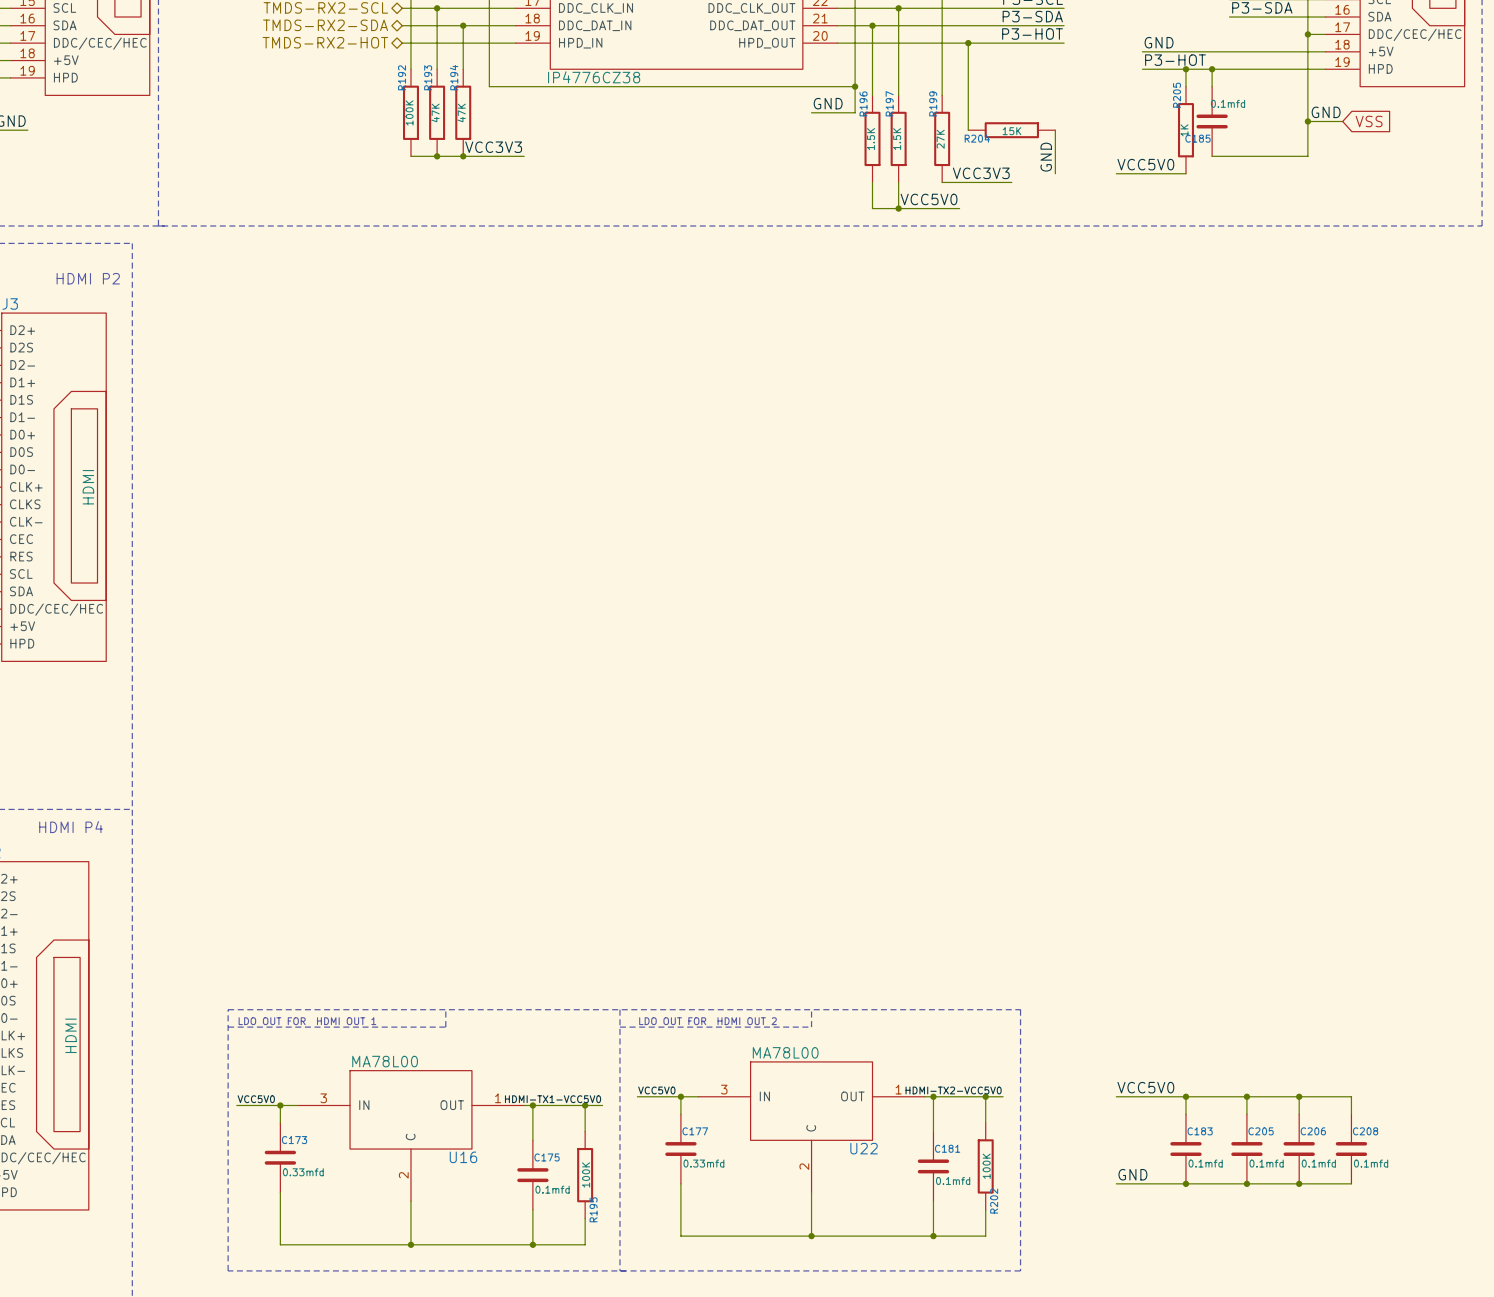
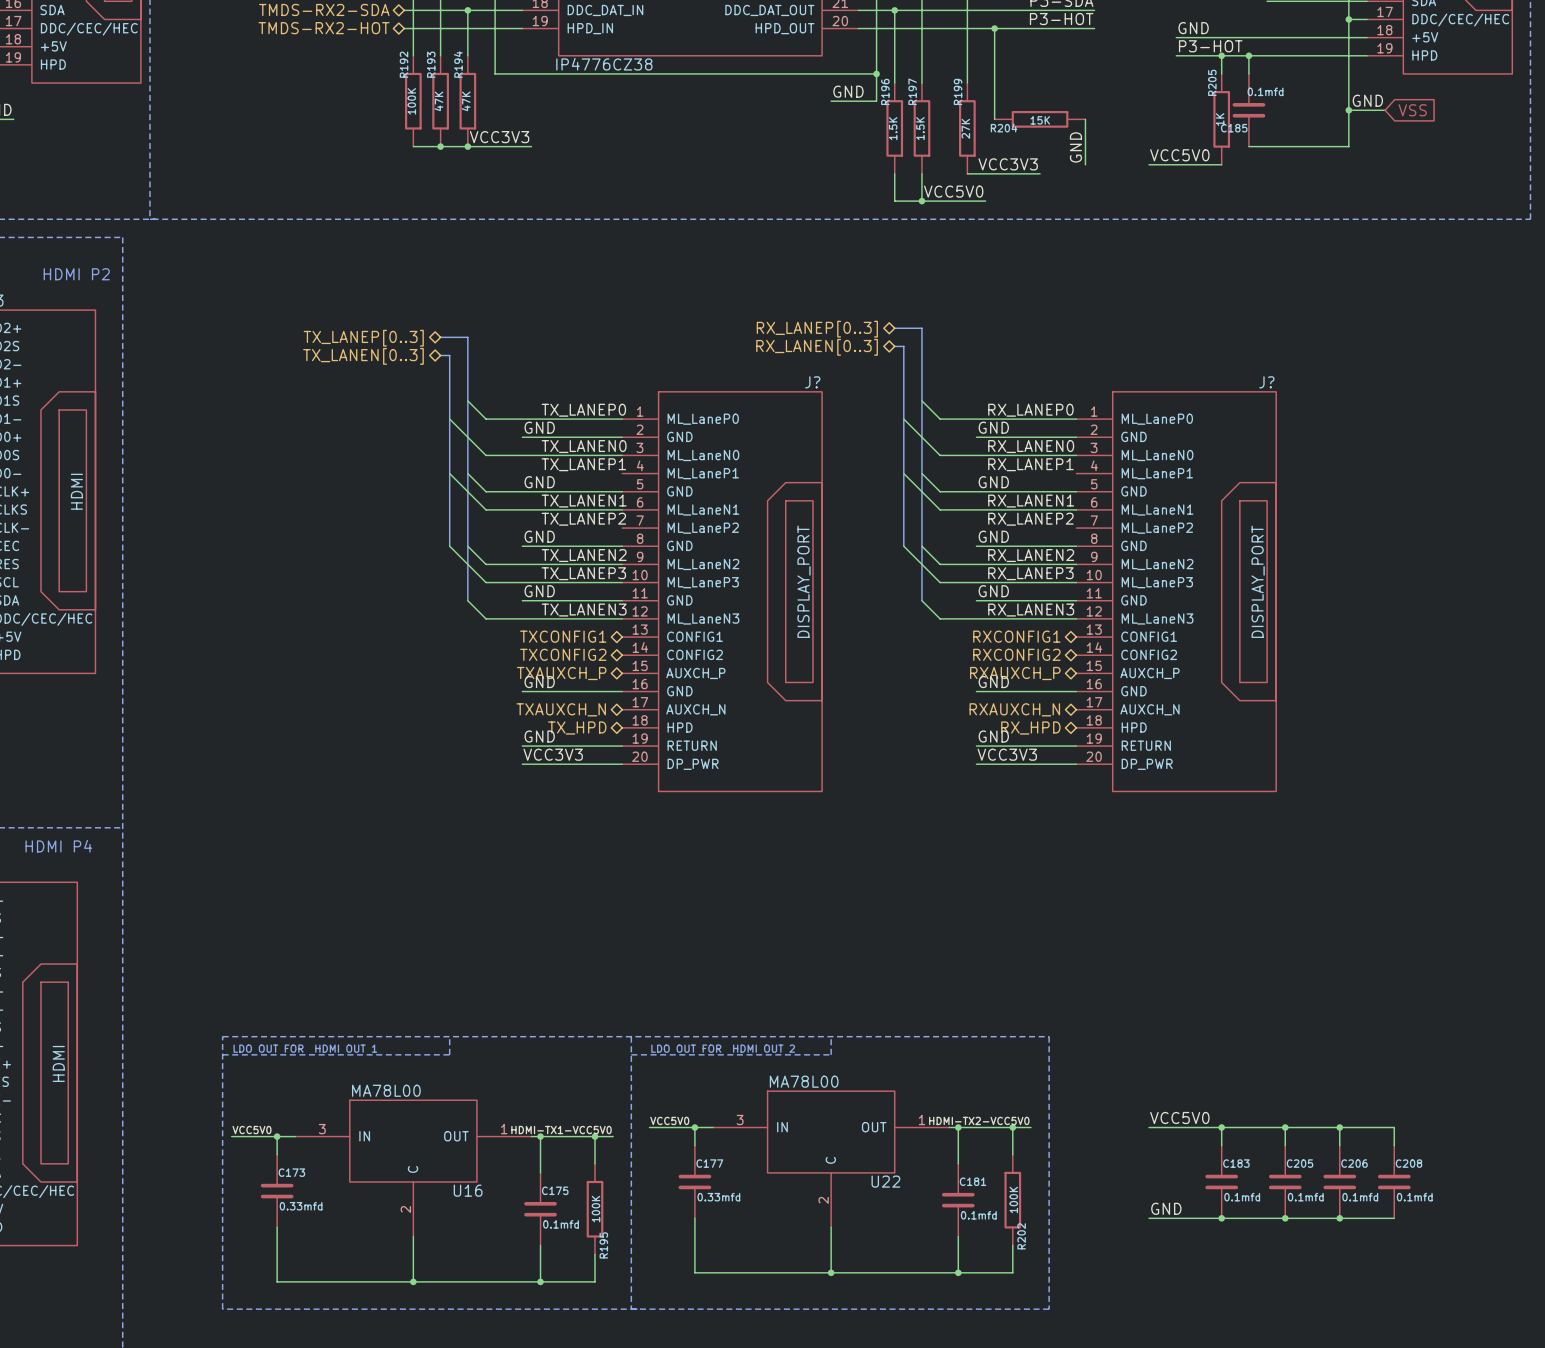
bus: none -> (894, 328) (921, 328) (921, 600)
hierarchical label: none -> RX_LANEP[0..3] (817, 329)
bus: none -> (440, 337) (467, 337) (467, 600)
hierarchical label: none -> TX_LANEP[0..3] (363, 338)
bus: none -> (894, 346) (903, 346) (903, 546)
hierarchical label: none -> RX_LANEN[0..3] (817, 347)
bus: none -> (440, 355) (449, 355) (449, 546)
hierarchical label: none -> TX_LANEN[0..3] (363, 356)
wire: none -> (467, 400) (486, 419) (622, 419)
wire: none -> (921, 400) (940, 419) (1076, 419)
label: none -> TX_LANEP0 (583, 410)
label: none -> RX_LANEP0 (1030, 410)
wire: none -> (449, 419) (486, 455) (622, 455)
wire: none -> (903, 419) (940, 455) (1076, 455)
label: none -> GND (539, 427)
label: none -> GND (993, 427)
wire: none -> (522, 437) (622, 437)
wire: none -> (976, 437) (1076, 437)
label: none -> TX_LANEN0 (584, 446)
label: none -> RX_LANEN0 (1031, 446)
label: none -> TX_LANEP1 (583, 464)
label: none -> RX_LANEP1 (1030, 464)
wire: none -> (449, 473) (486, 509) (622, 509)
wire: none -> (467, 473) (486, 491) (622, 491)
wire: none -> (903, 473) (940, 509) (1076, 509)
wire: none -> (921, 473) (940, 491) (1076, 491)
label: none -> GND (539, 482)
label: none -> GND (993, 482)
label: none -> TX_LANEN1 (584, 501)
label: none -> RX_LANEN1 (1031, 501)
label: none -> TX_LANEP2 (583, 519)
label: none -> RX_LANEP2 (1030, 519)
label: none -> GND (539, 536)
label: none -> GND (993, 536)
wire: none -> (449, 546) (486, 582) (622, 582)
wire: none -> (467, 546) (486, 564) (622, 564)
wire: none -> (522, 546) (622, 546)
wire: none -> (903, 546) (940, 582) (1076, 582)
wire: none -> (921, 546) (940, 564) (1076, 564)
wire: none -> (976, 546) (1076, 546)
label: none -> TX_LANEN2 (584, 555)
label: none -> RX_LANEN2 (1031, 555)
label: none -> TX_LANEP3 (583, 573)
label: none -> RX_LANEP3 (1030, 573)
label: none -> GND (539, 591)
label: none -> GND (993, 591)
J?: none -> DISPLAY_PORT (722, 591)
J?: none -> DISPLAY_PORT (1176, 591)
wire: none -> (467, 600) (486, 618) (622, 618)
wire: none -> (522, 600) (622, 600)
wire: none -> (921, 600) (940, 618) (1076, 618)
wire: none -> (976, 600) (1076, 600)
label: none -> TX_LANEN3 (584, 610)
label: none -> RX_LANEN3 (1031, 610)
hierarchical label: none -> TXCONFIG1 (563, 636)
hierarchical label: none -> RXCONFIG1 (1016, 636)
hierarchical label: none -> TXCONFIG2 (563, 654)
hierarchical label: none -> RXCONFIG2 (1016, 654)
hierarchical label: none -> TXAUXCH_P (561, 673)
hierarchical label: none -> RXAUXCH_P (1015, 673)
label: none -> GND (539, 682)
label: none -> GND (993, 682)
wire: none -> (522, 691) (622, 691)
wire: none -> (976, 691) (1076, 691)
hierarchical label: none -> TXAUXCH_N (561, 709)
hierarchical label: none -> RXAUXCH_N (1014, 709)
hierarchical label: none -> TX_HPD (577, 727)
hierarchical label: none -> RX_HPD (1030, 727)
label: none -> GND (539, 736)
label: none -> GND (993, 736)
wire: none -> (522, 746) (622, 746)
wire: none -> (976, 746) (1076, 746)
label: none -> VCC3V3 (553, 754)
label: none -> VCC3V3 (1007, 754)
wire: none -> (522, 764) (622, 764)
wire: none -> (976, 764) (1076, 764)

